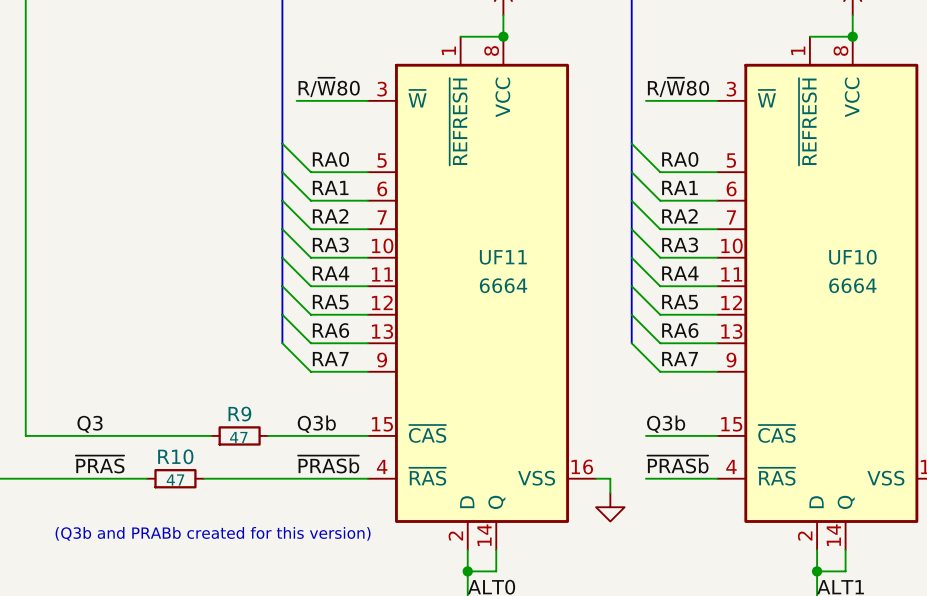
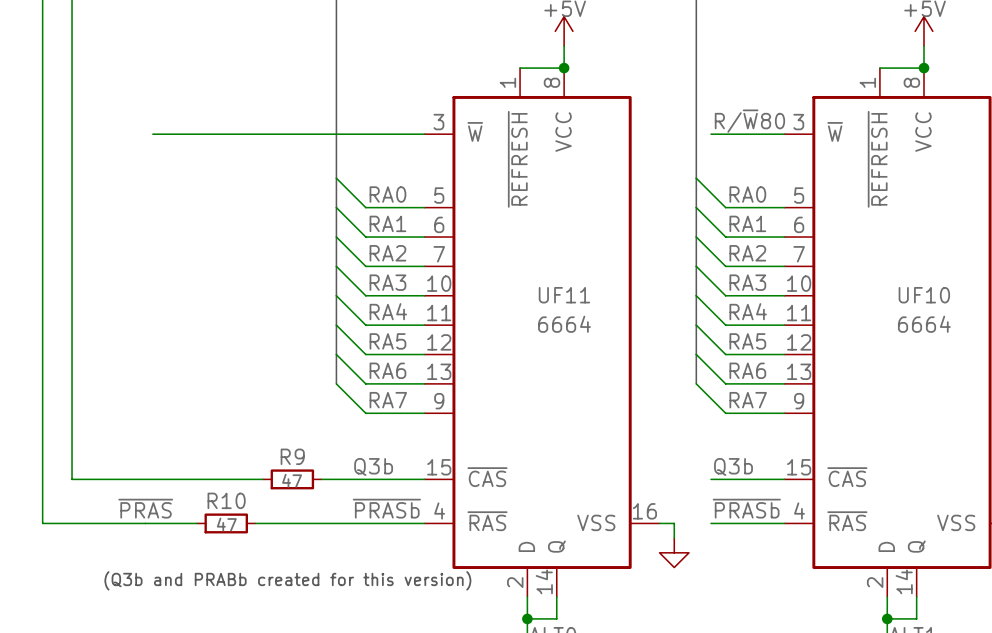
label: R/~{W}80 (329, 87) -> none
wire: none -> (152, 134) (351, 134)
label: Q3 (90, 424) -> none

